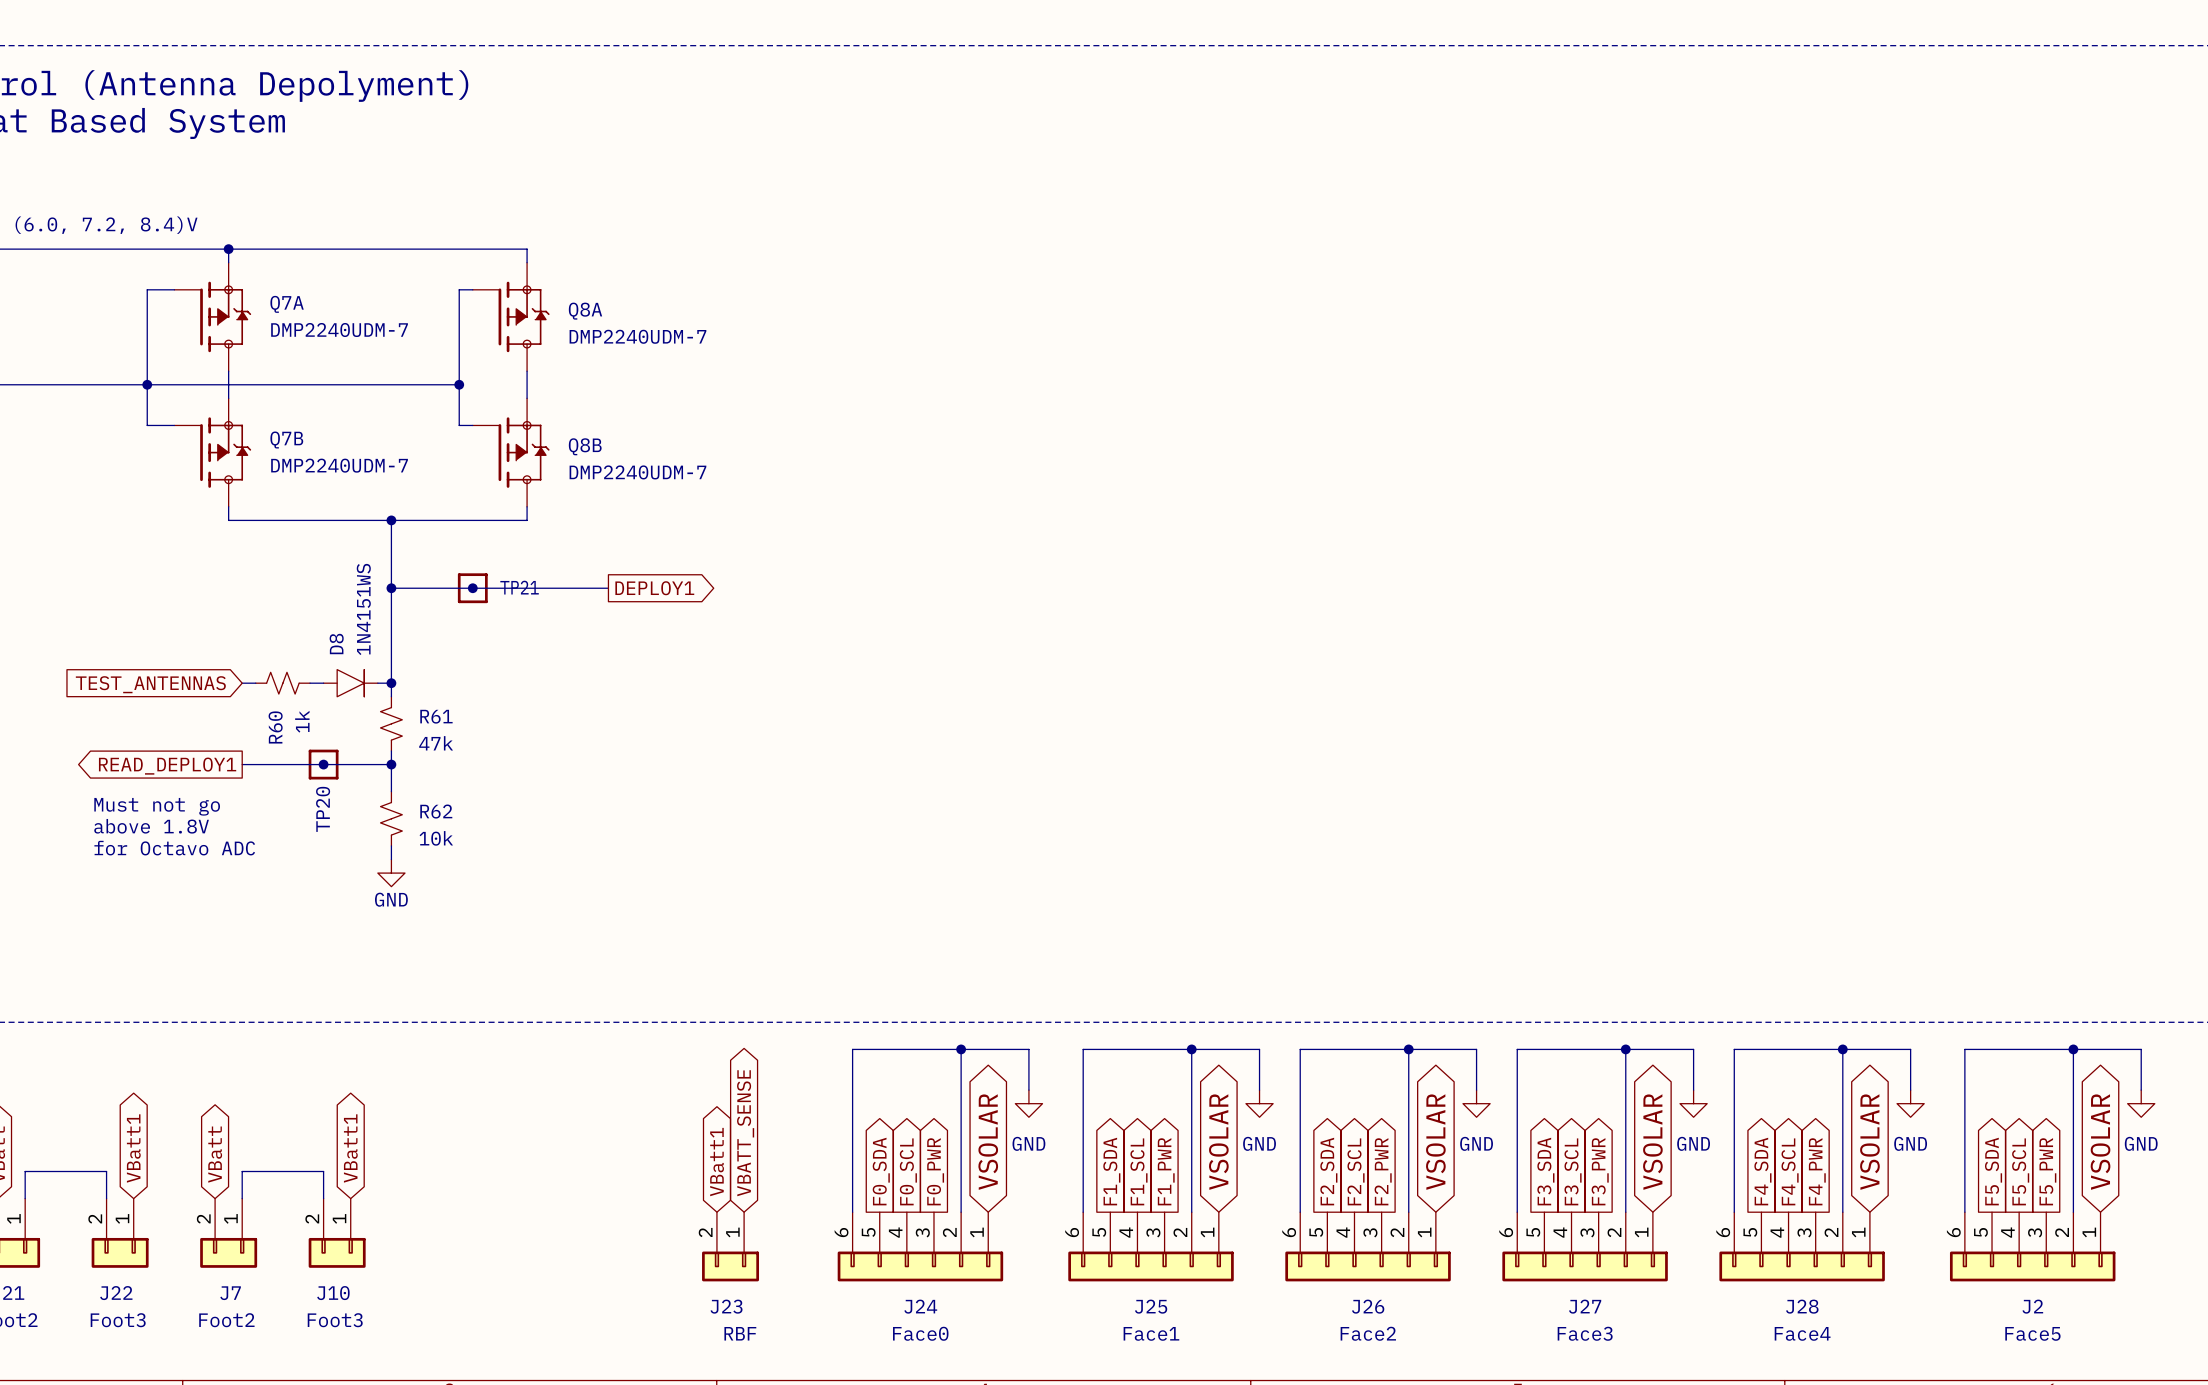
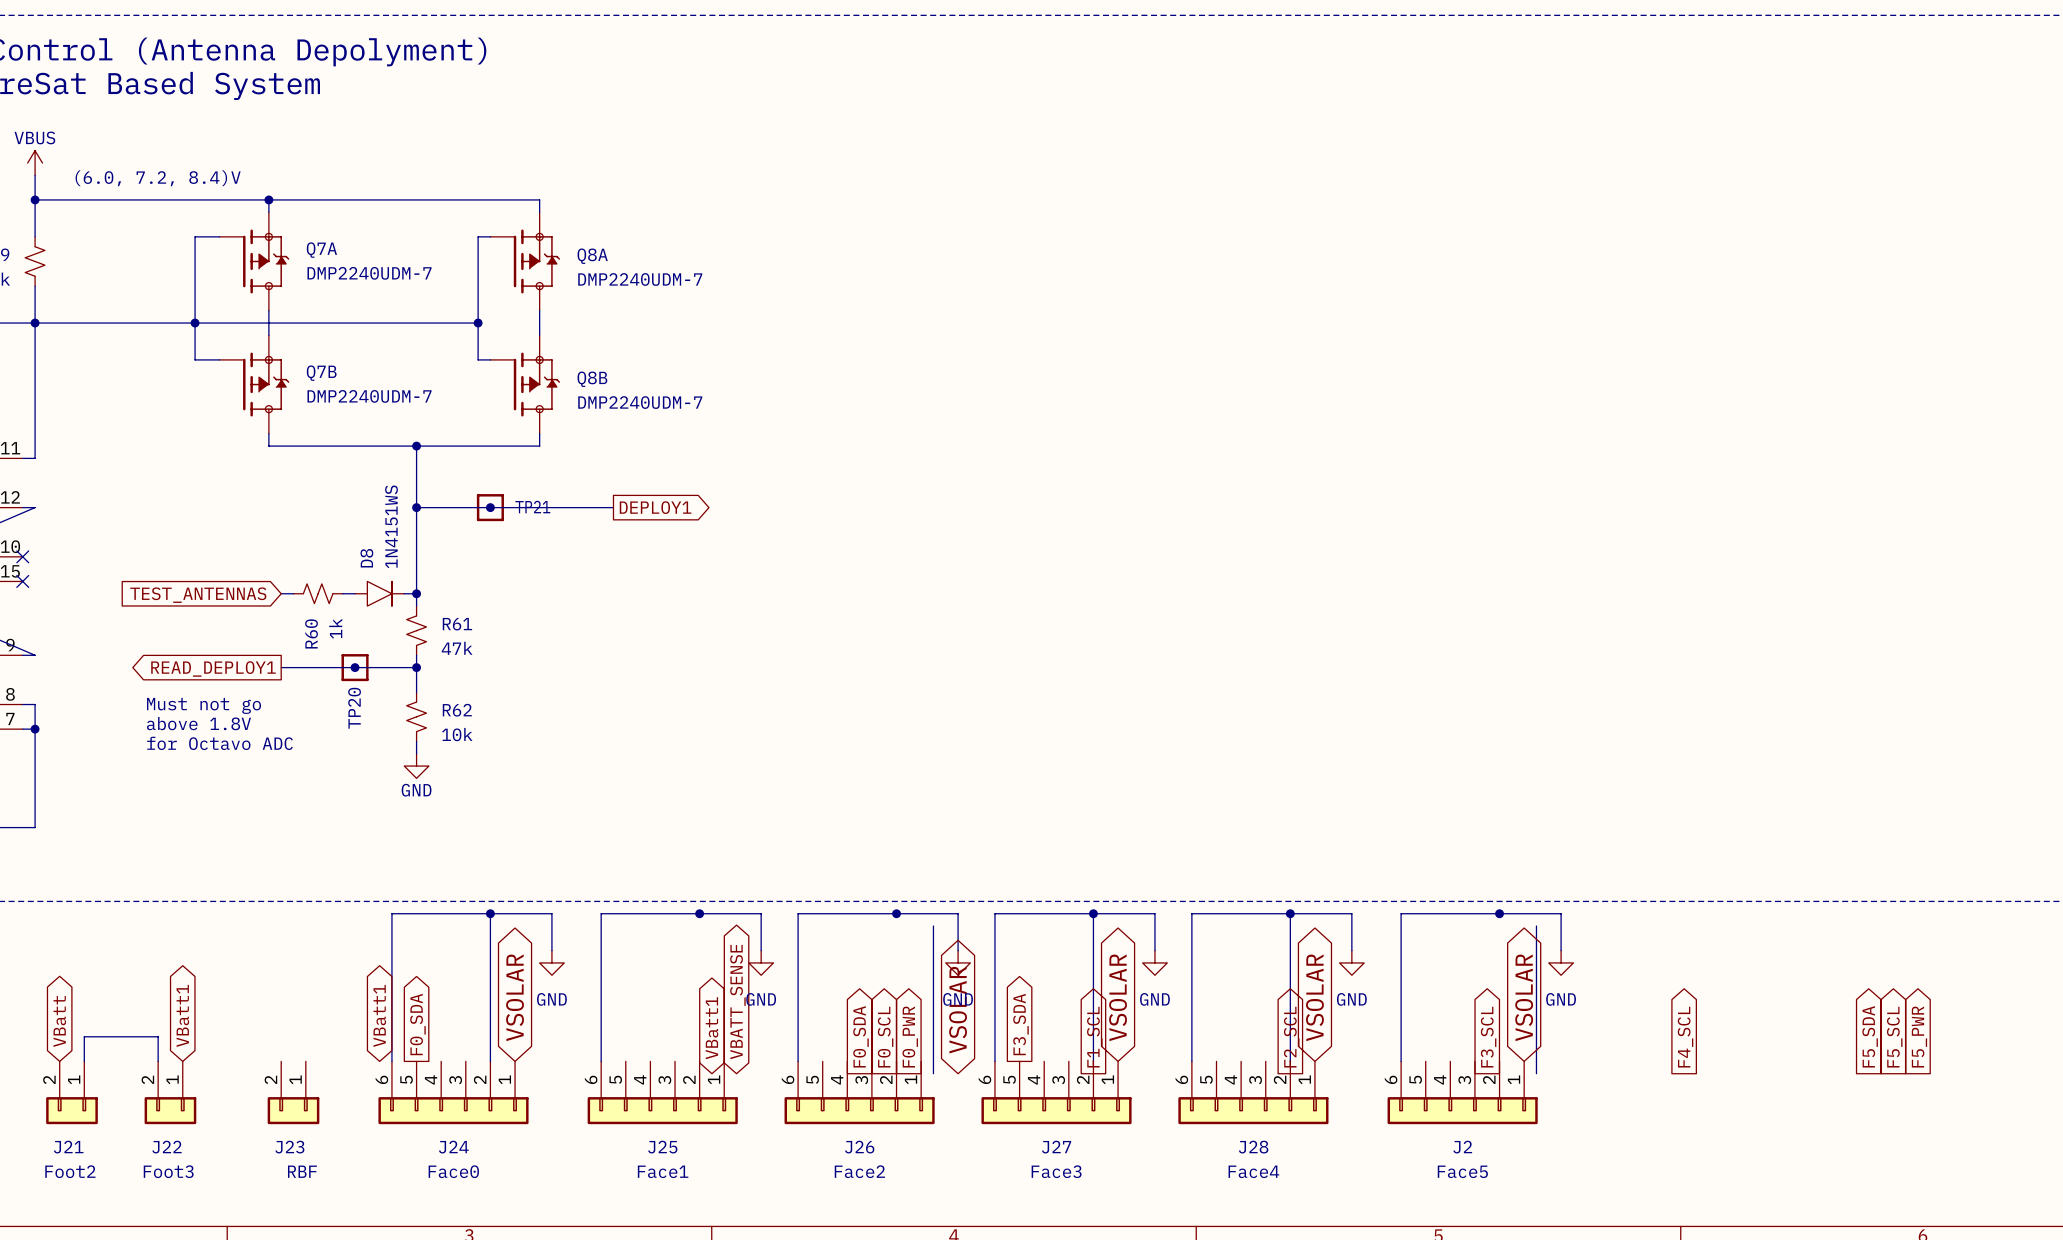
wire: none -> (490, 913) (490, 1061)
junction: none -> (490, 913)
junction: none -> (699, 913)
junction position: (961, 1049) -> (896, 913)
wire: (1028, 1049) (852, 1049) (852, 1212) -> (994, 926) (994, 913) (1154, 913) (1154, 950)
wire: (1191, 1049) (1191, 1212) -> (1093, 913) (1093, 1061)
junction position: (1191, 1049) -> (1093, 913)
wire: (1408, 1049) (1408, 1212) -> (1290, 913) (1290, 1061)
junction position: (1408, 1049) -> (1290, 913)
wire: (1476, 1049) (1300, 1049) (1300, 1212) -> (1401, 926) (1401, 913) (1561, 913) (1561, 950)
junction position: (1625, 1049) -> (1499, 913)
wire: (1842, 1049) (1842, 1212) -> none
junction: (1842, 1049) -> none
wire: (2073, 1049) (2073, 1212) -> none
junction: (2073, 1049) -> none
wire: none -> (551, 950) (551, 913) (391, 913) (391, 1061)
wire: none -> (761, 950) (761, 913) (601, 913) (601, 1061)
wire: none -> (958, 950) (958, 913) (798, 913) (798, 1061)
power symbol: none -> GND (551, 962)
power symbol: none -> GND (761, 962)
wire: none -> (994, 962) (994, 1061)
wire: (1259, 1090) (1259, 1049) (1083, 1049) (1083, 1212) -> (1351, 950) (1351, 913) (1191, 913) (1191, 1061)
wire: none -> (1401, 962) (1401, 1061)
wire: (1693, 1090) (1693, 1049) (1517, 1049) (1517, 1212) -> none
wire: (1910, 1090) (1910, 1049) (1734, 1049) (1734, 1212) -> none
wire: (2141, 1090) (2141, 1049) (1964, 1049) (1964, 1212) -> none
power symbol position: GND (1028, 1103) -> GND (958, 962)
power symbol position: GND (1259, 1103) -> GND (1154, 962)
power symbol position: GND (1476, 1103) -> GND (1351, 962)
power symbol position: GND (1693, 1103) -> GND (1561, 962)
power symbol: GND (1910, 1103) -> none
power symbol: GND (2141, 1103) -> none
global label: none -> VSOLAR (515, 997)
global label position: VSOLAR (1218, 1142) -> VSOLAR (1118, 997)
global label position: VSOLAR (1435, 1142) -> VSOLAR (1314, 997)
global label position: VSOLAR (1652, 1142) -> VSOLAR (1524, 997)
global label: VSOLAR (1869, 1142) -> none
global label: VSOLAR (2100, 1142) -> none
global label: VBatt (215, 1154) -> none
global label: none -> F0_SDA (417, 1024)
global label: none -> F3_SDA (1020, 1024)
global label: F1_SDA (1111, 1171) -> none
global label: F1_PWR (1166, 1171) -> none
global label: F2_SDA (1328, 1171) -> none
global label: F2_PWR (1383, 1171) -> none
global label: F3_SDA (1545, 1171) -> none
global label: F3_PWR (1600, 1171) -> none
global label: F4_SDA (1762, 1171) -> none
global label: F4_PWR (1817, 1171) -> none
wire: (242, 1198) (242, 1171) (323, 1171) (323, 1198) -> none
J7: Foot2 (228, 1233) -> none
J10: Foot3 (337, 1233) -> none
J23 position: (730, 1246) -> (293, 1092)
J24 position: (920, 1246) -> (453, 1092)
J25 position: (1151, 1246) -> (662, 1092)
J26 position: (1368, 1246) -> (859, 1092)
J27 position: (1585, 1246) -> (1056, 1092)
J28 position: (1802, 1246) -> (1253, 1092)
J2 position: (2032, 1246) -> (1462, 1092)

